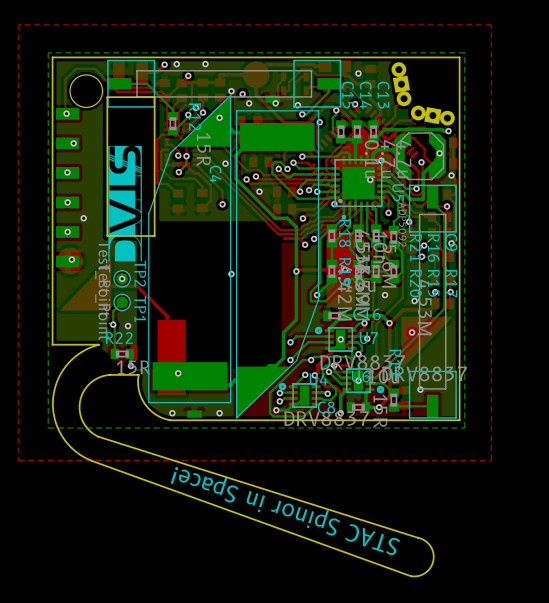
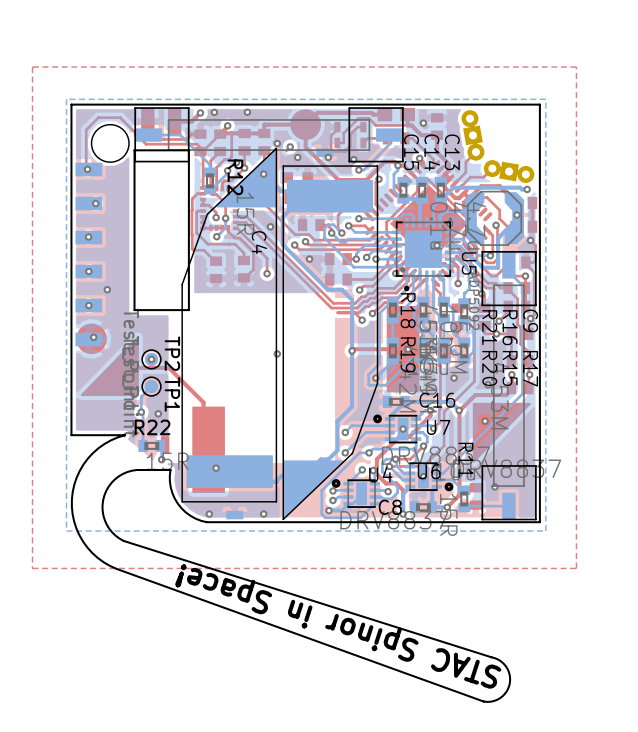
drawing: [108, 145, 142, 262] -> none

